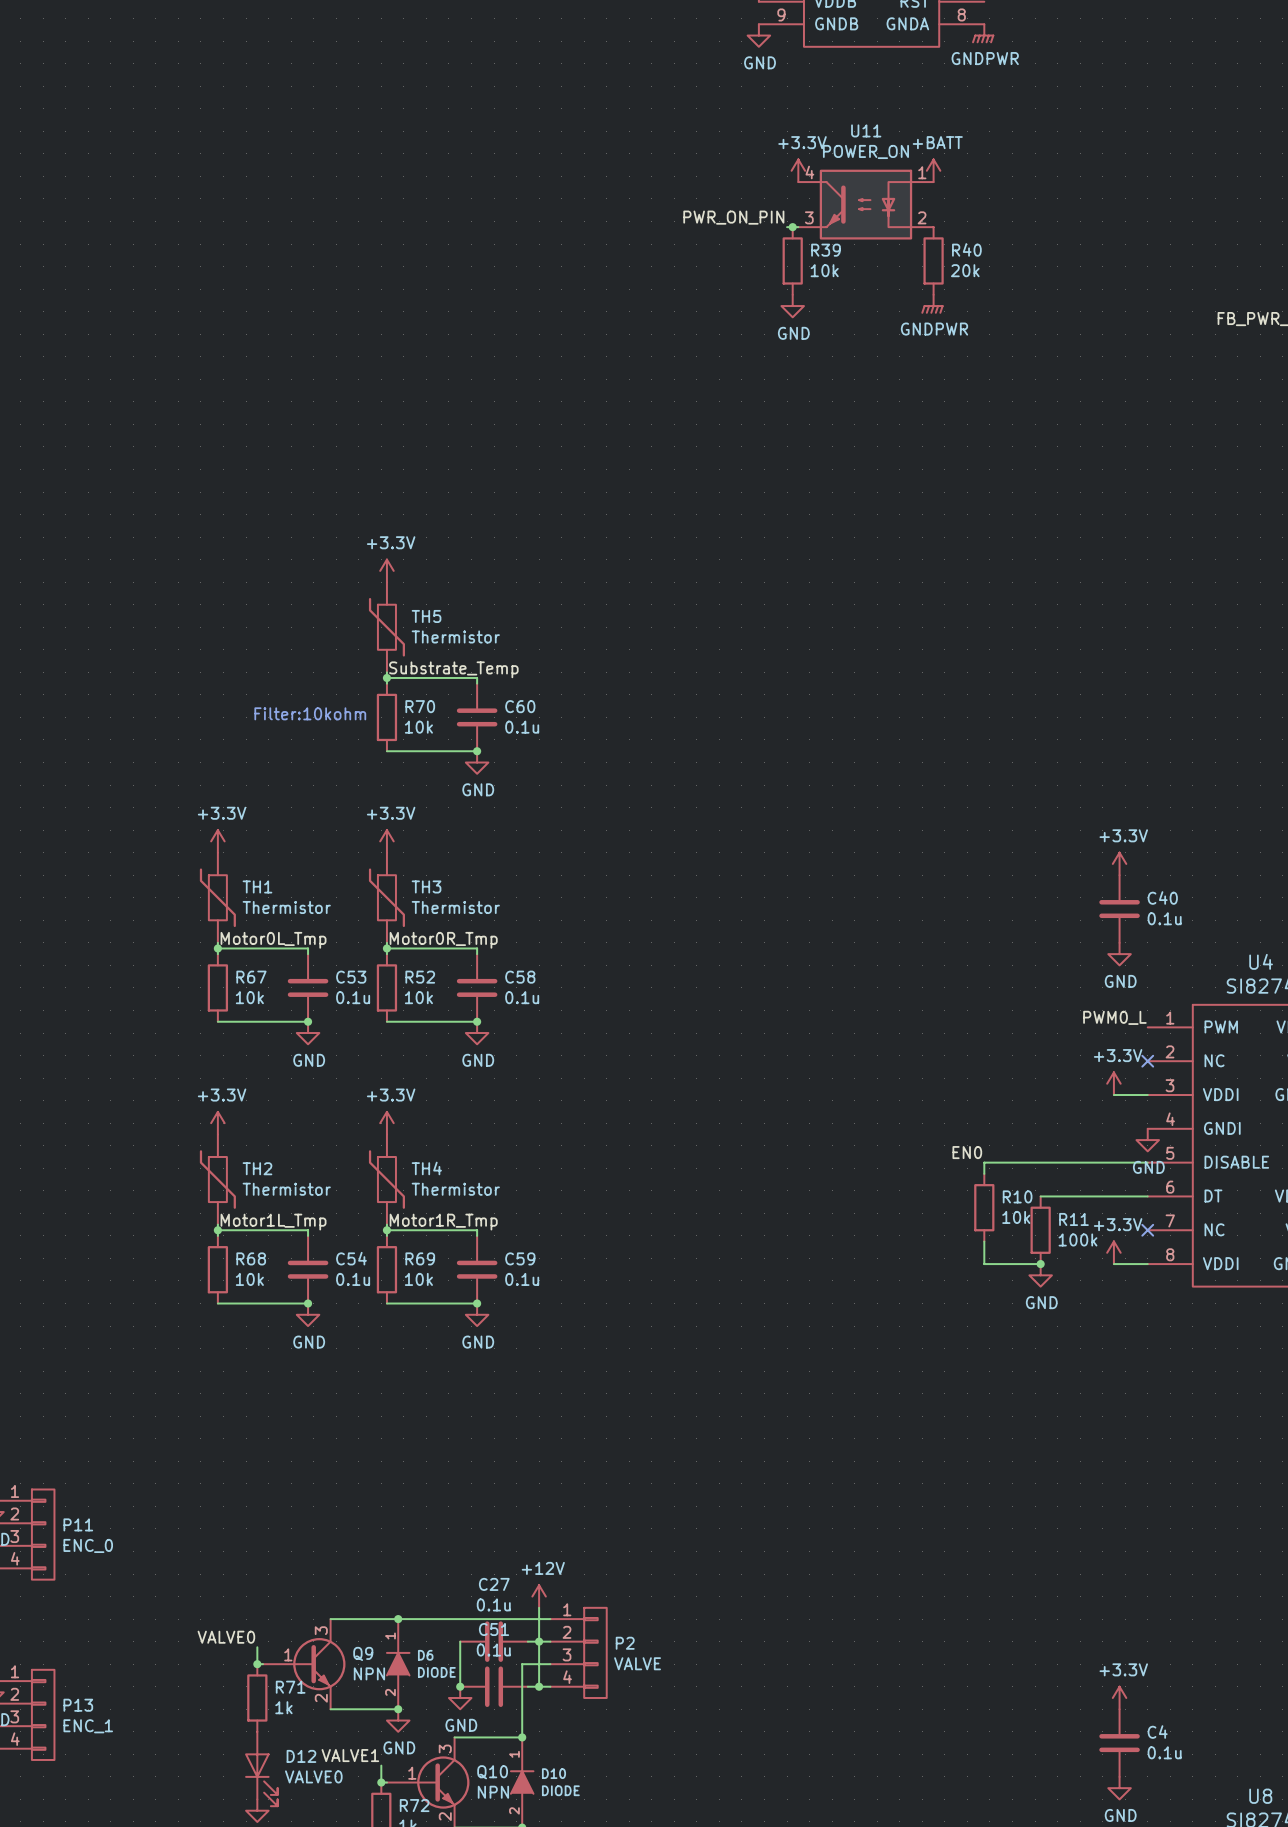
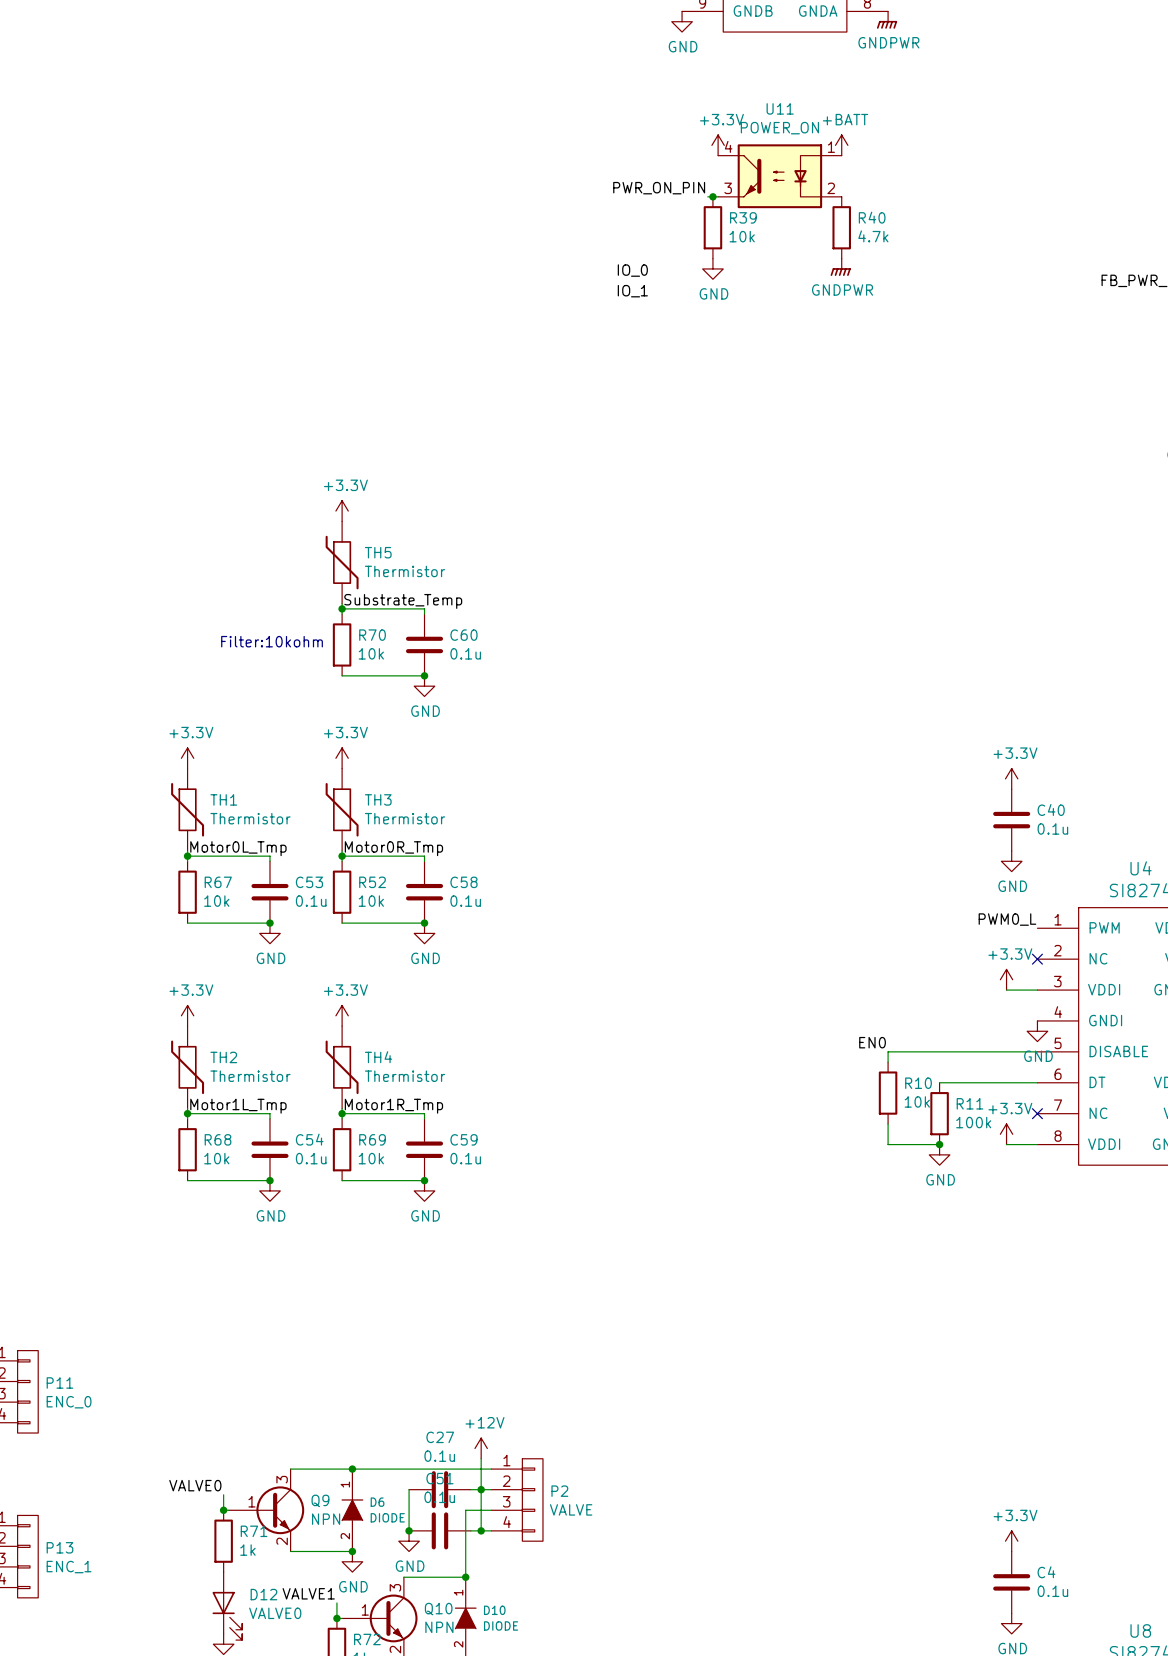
R40 value: 20k (965, 270) -> 4.7k (873, 236)
label: none -> IO_0 (632, 270)
label: none -> IO_1 (632, 291)

